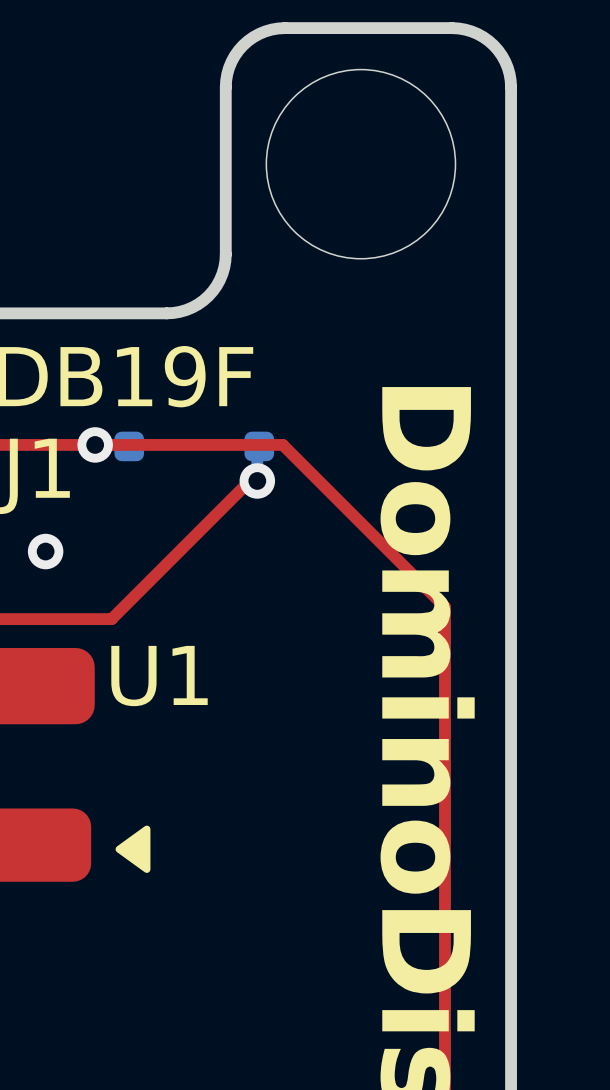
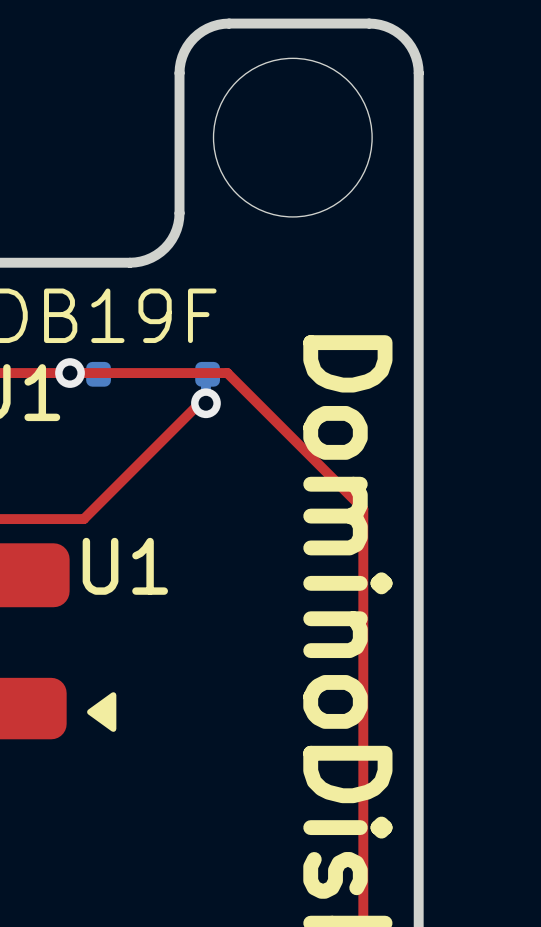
via: (45, 551) -> none

